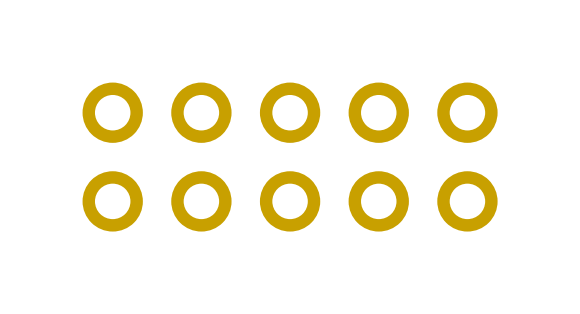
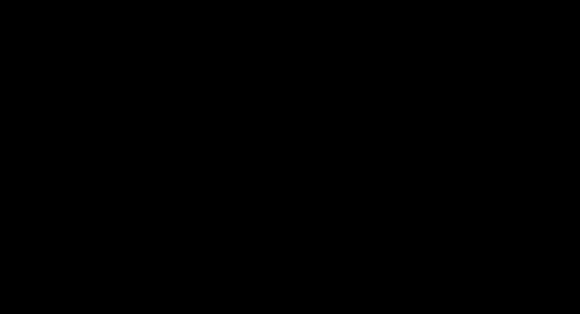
part: (290, 157) -> none

